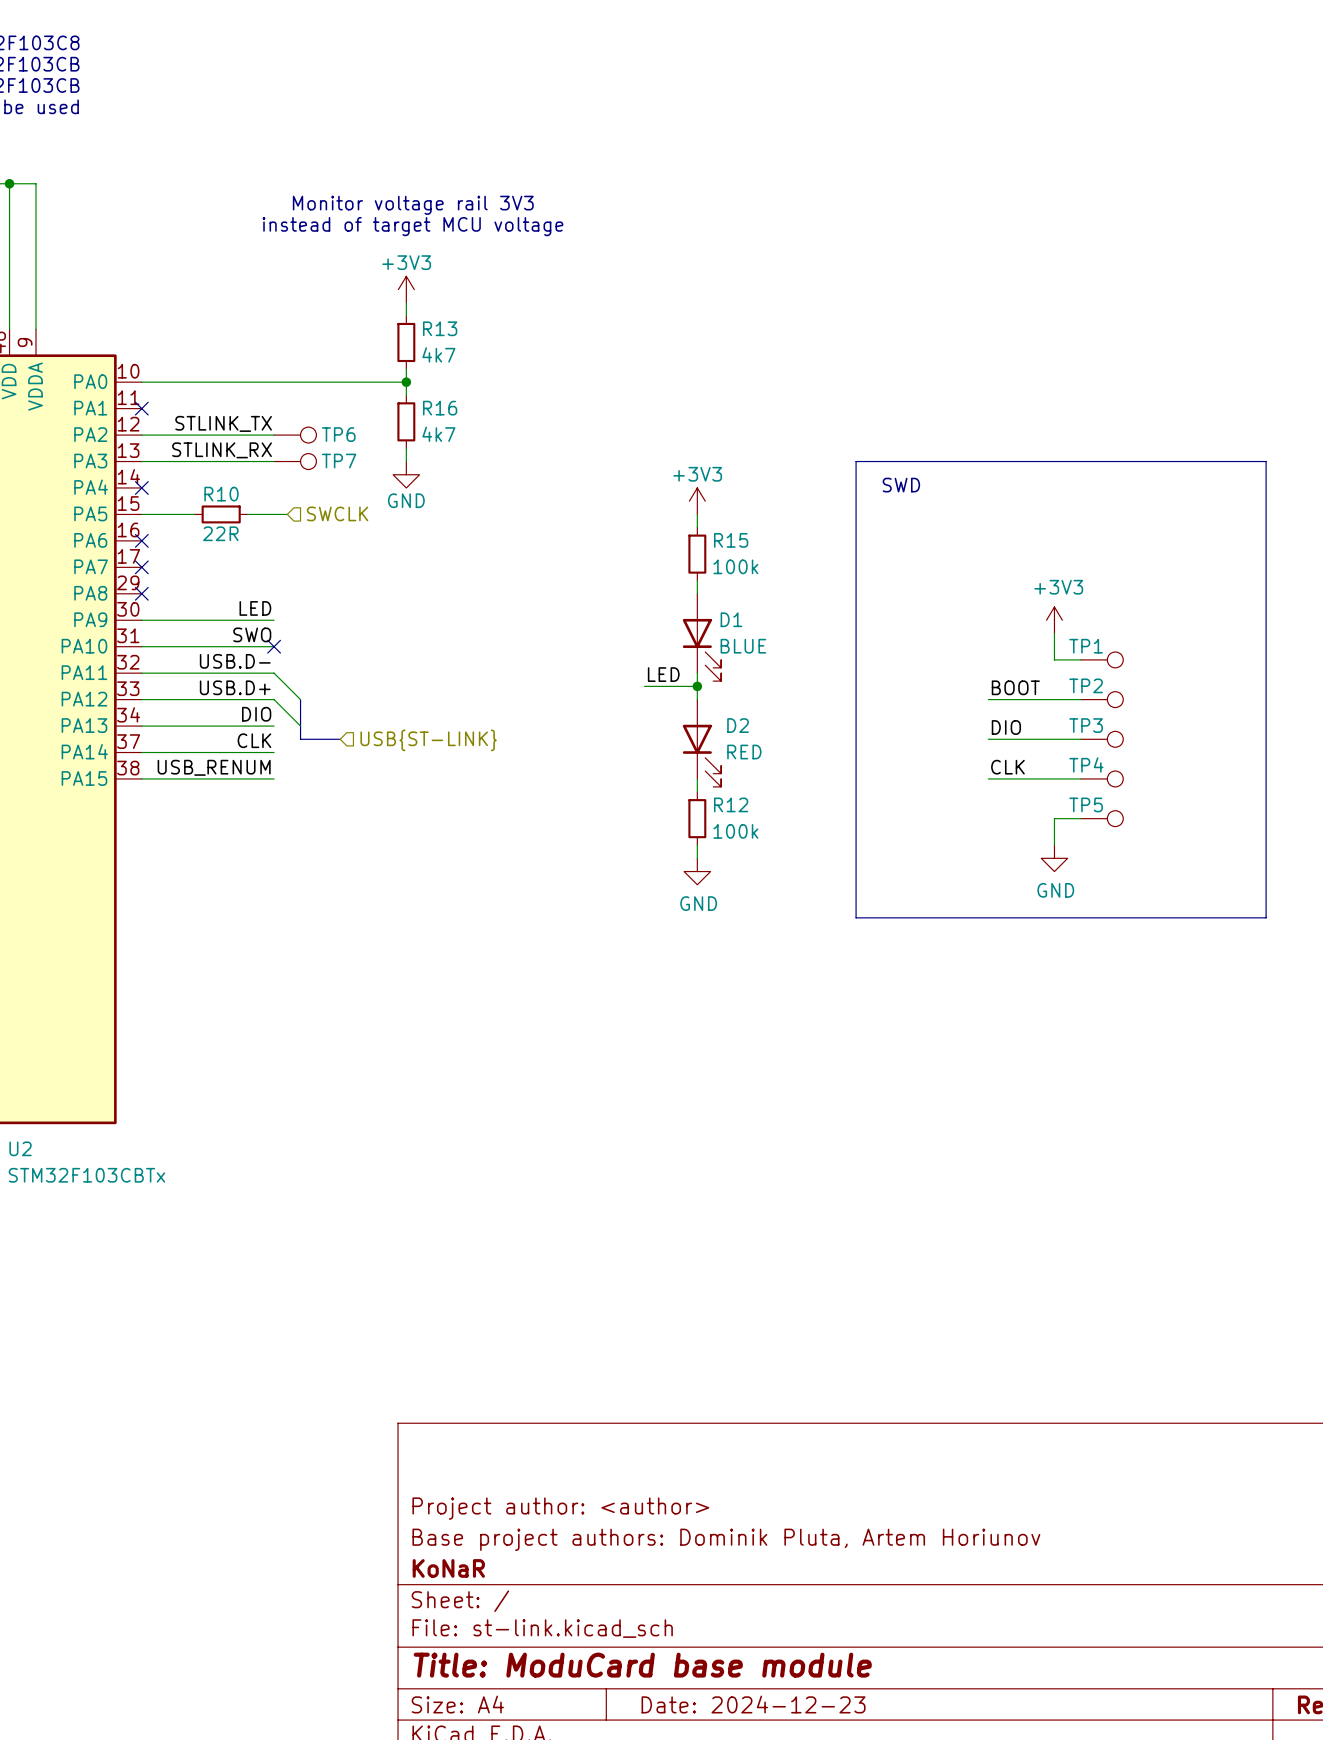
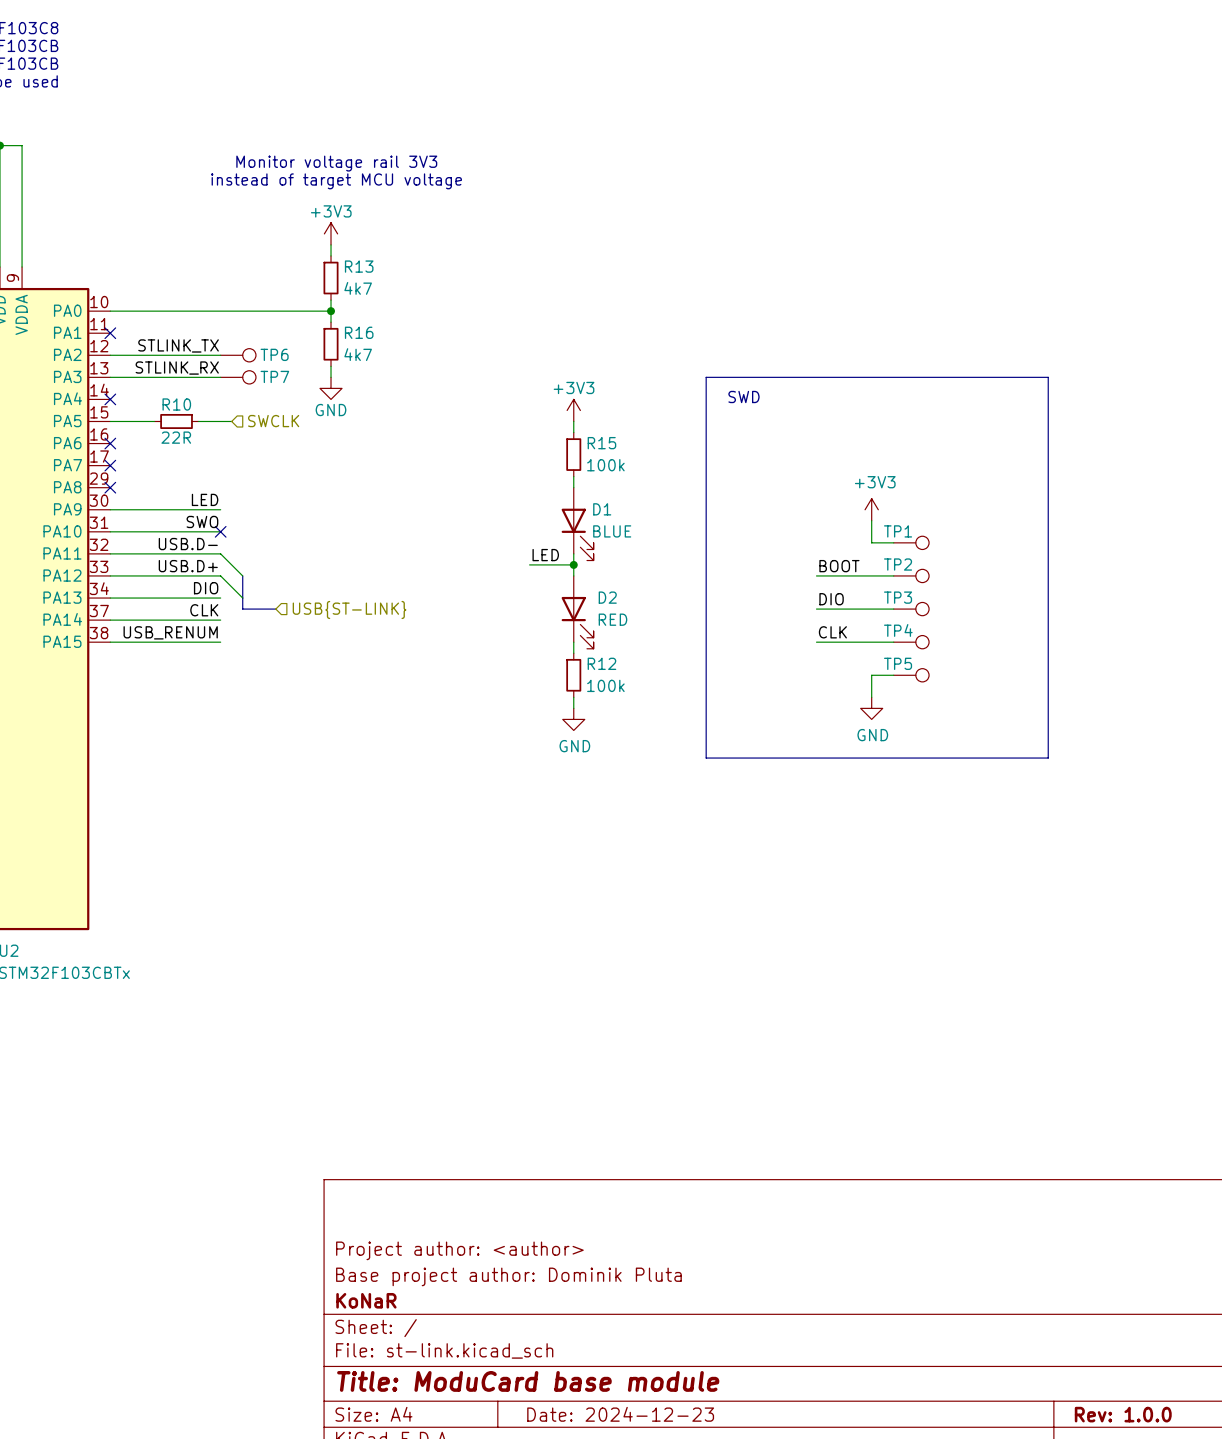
title block: Base project authors: Dominik Pluta, Artem Horiunov (726, 1539) -> Base project author: Dominik Pluta (508, 1276)

